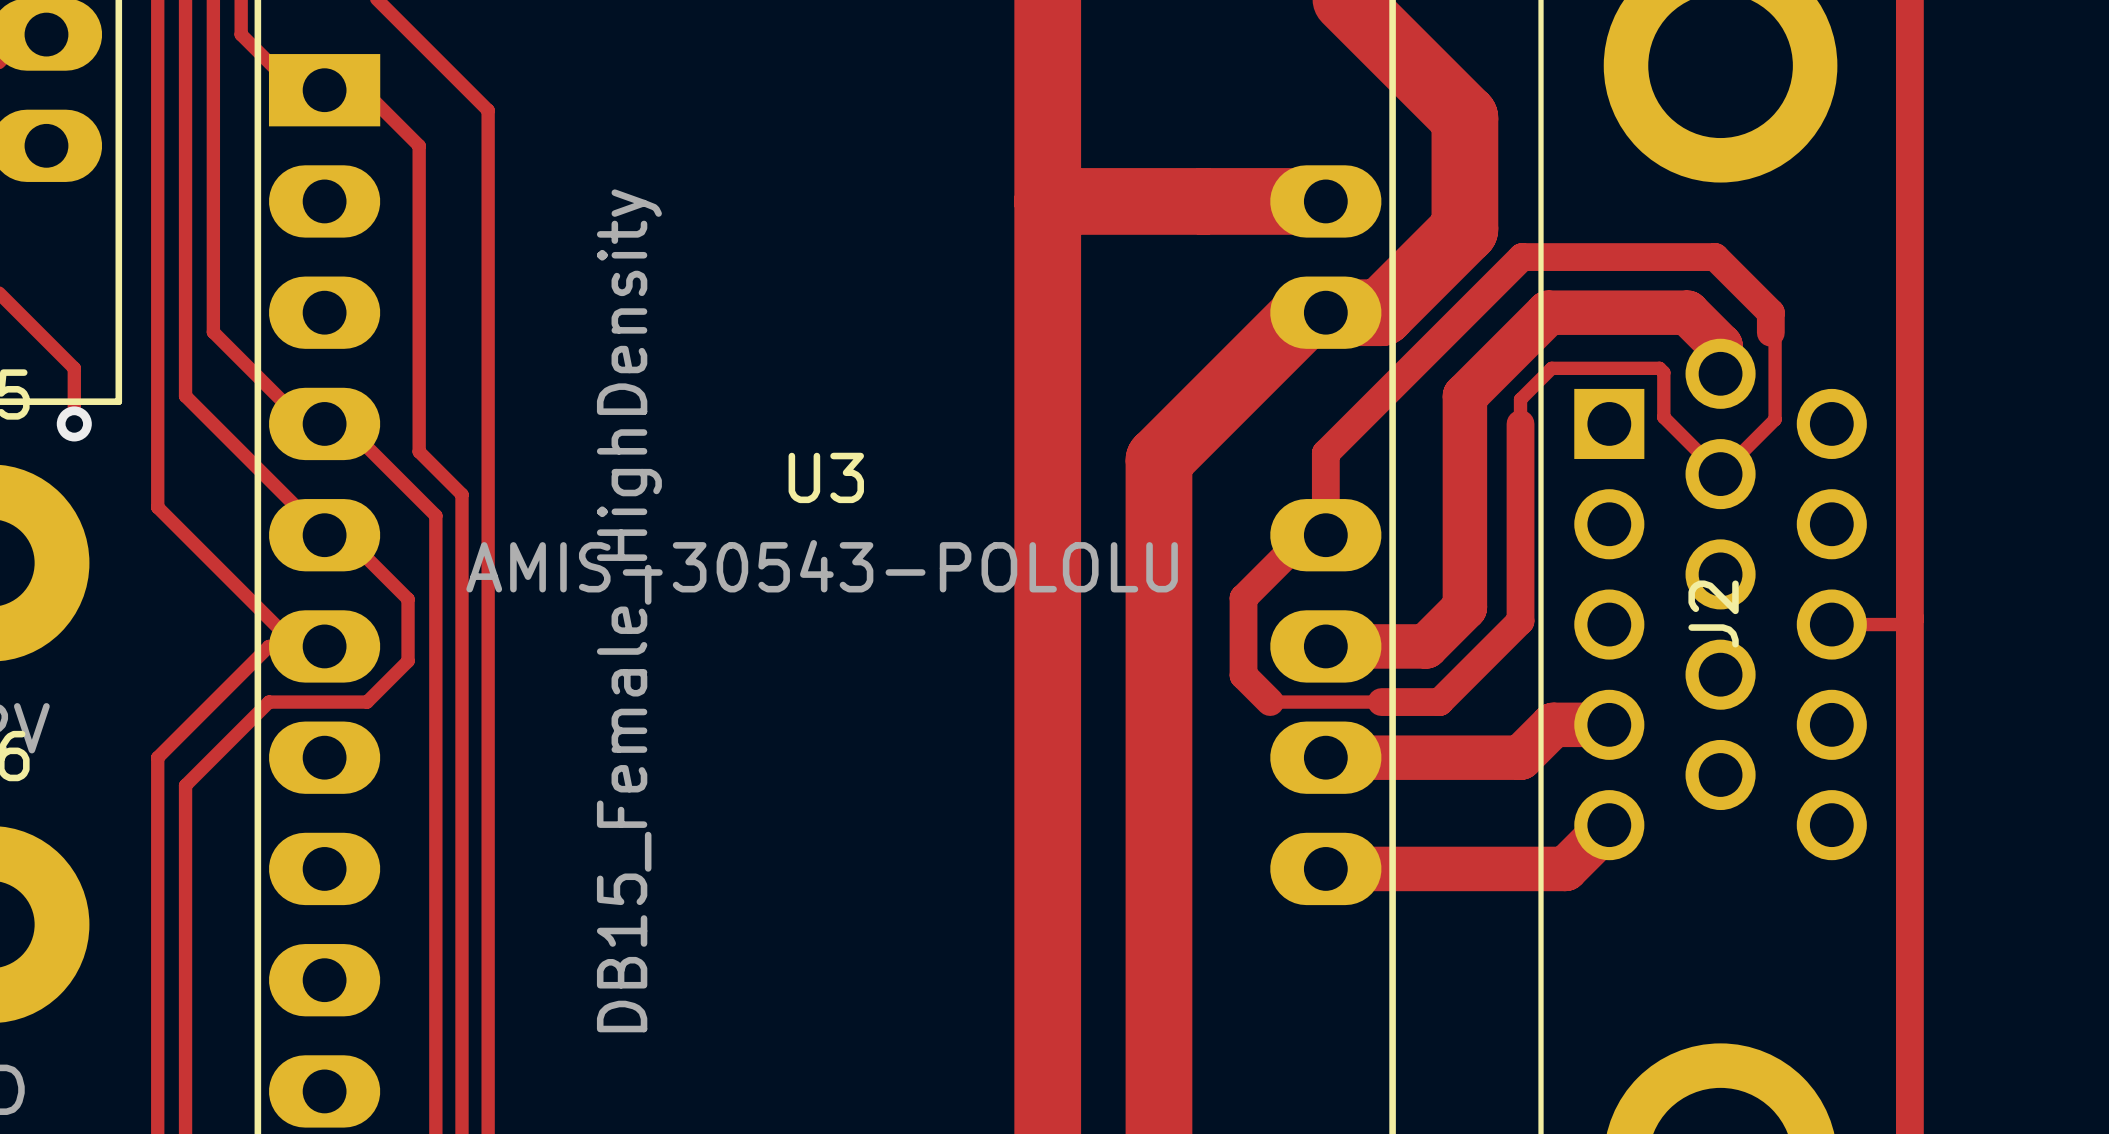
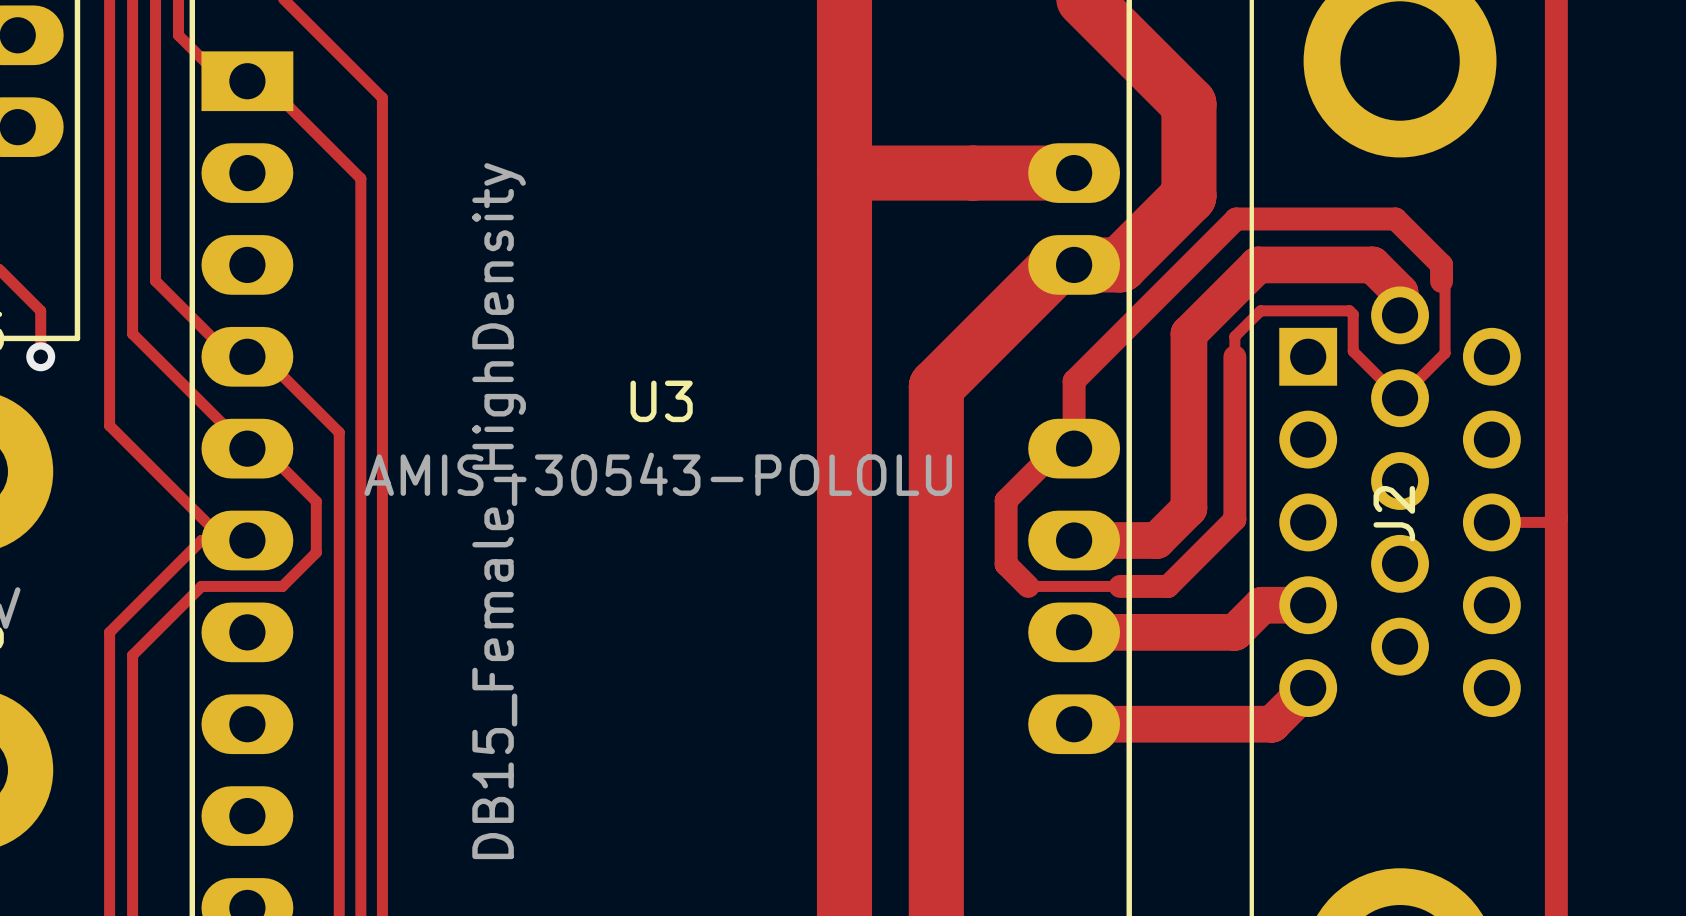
track: (344, 90) (363, 90) (419, 145) (419, 451) (462, 494) -> (263, 81) (360, 178) (360, 415)

